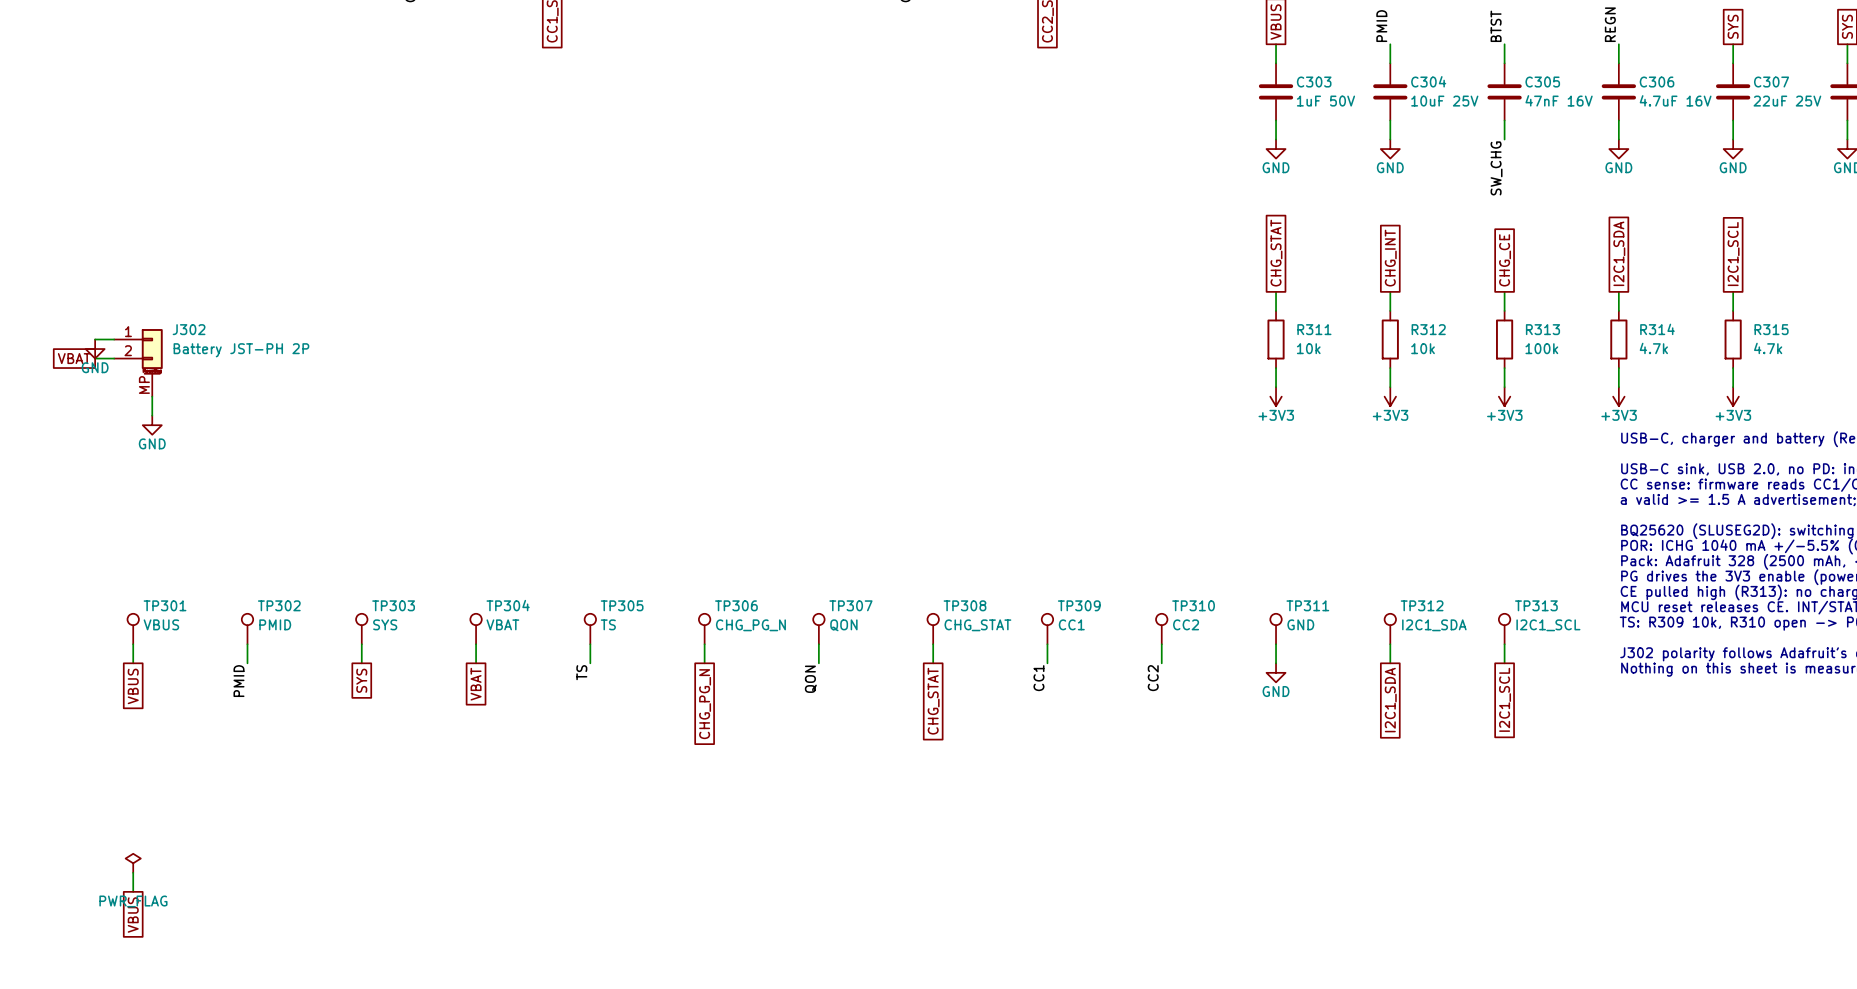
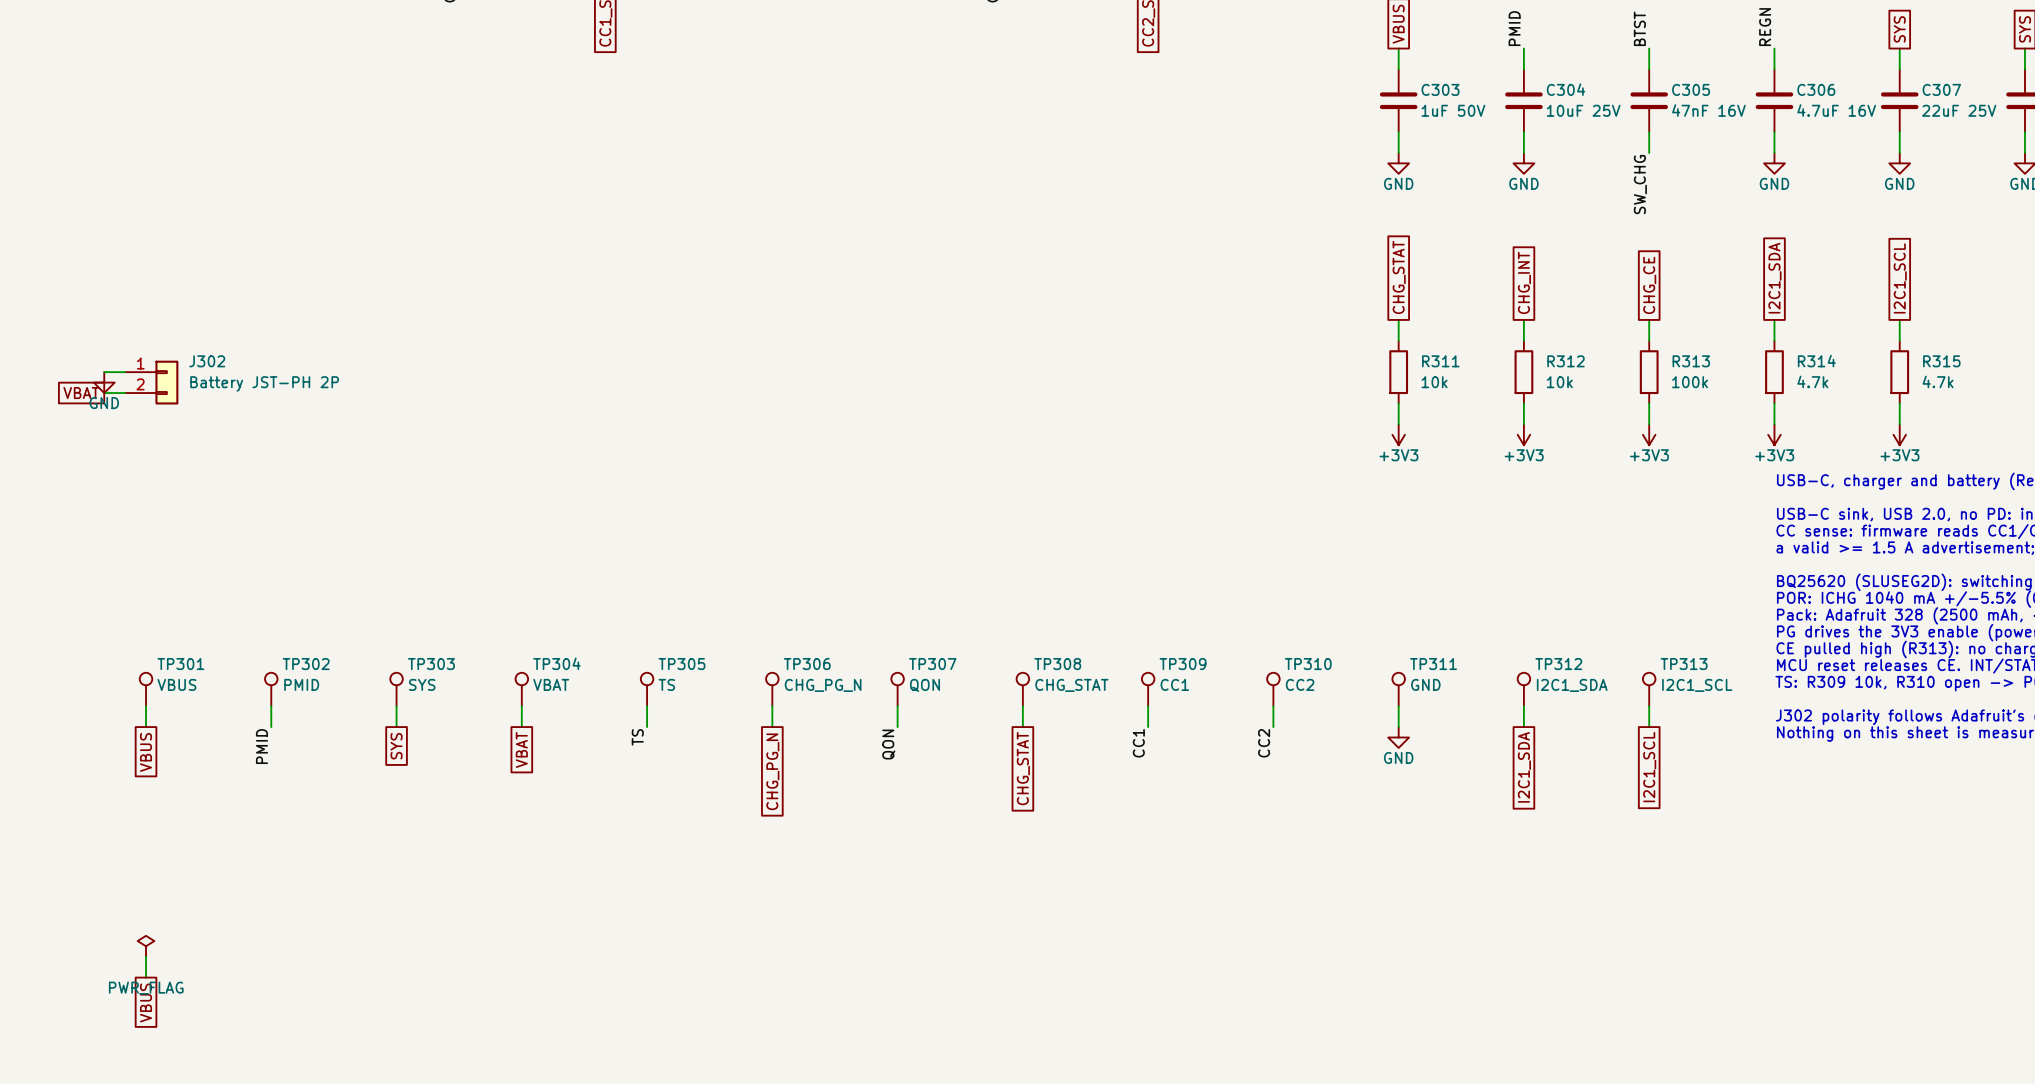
J302 symbol: [114, 329, 163, 397] -> [125, 360, 179, 405]
wire: (152, 396) (152, 415) -> none
power symbol: GND (152, 425) -> none

